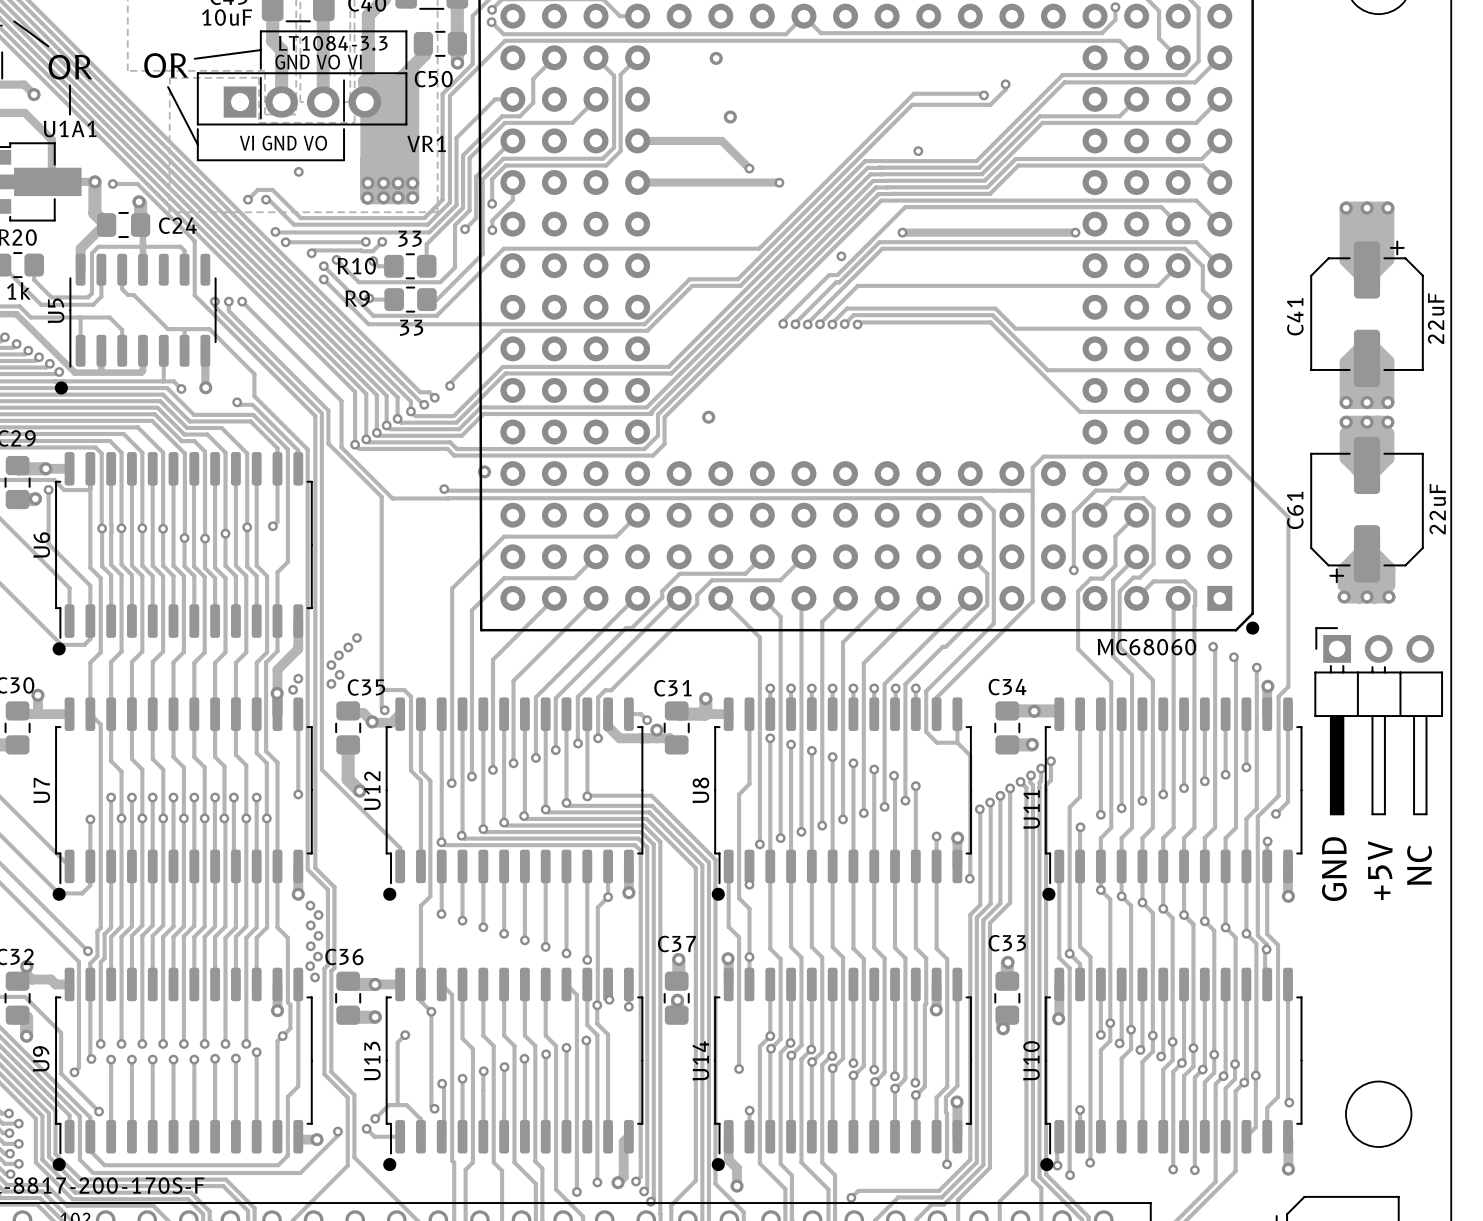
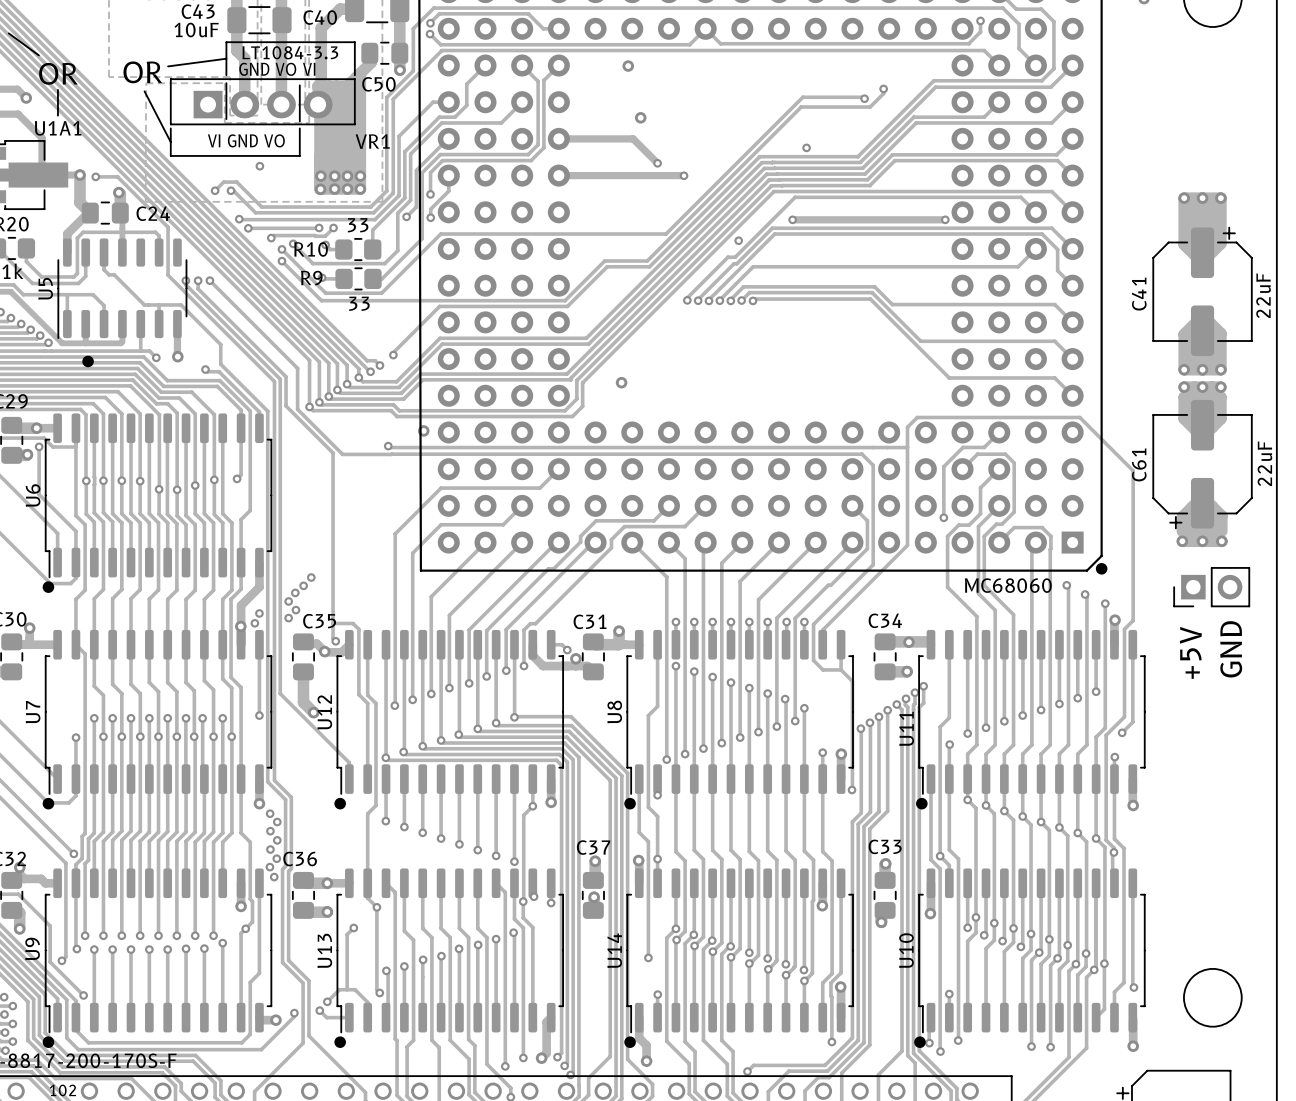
drawing position: (61, 387) -> (88, 361)
part: none -> (1211, 587)
part: (1378, 721) -> none
text: NC (1419, 865) -> none
text position: GND (1334, 869) -> GND (1231, 649)
text position: +5V (1380, 870) -> +5V (1190, 652)

